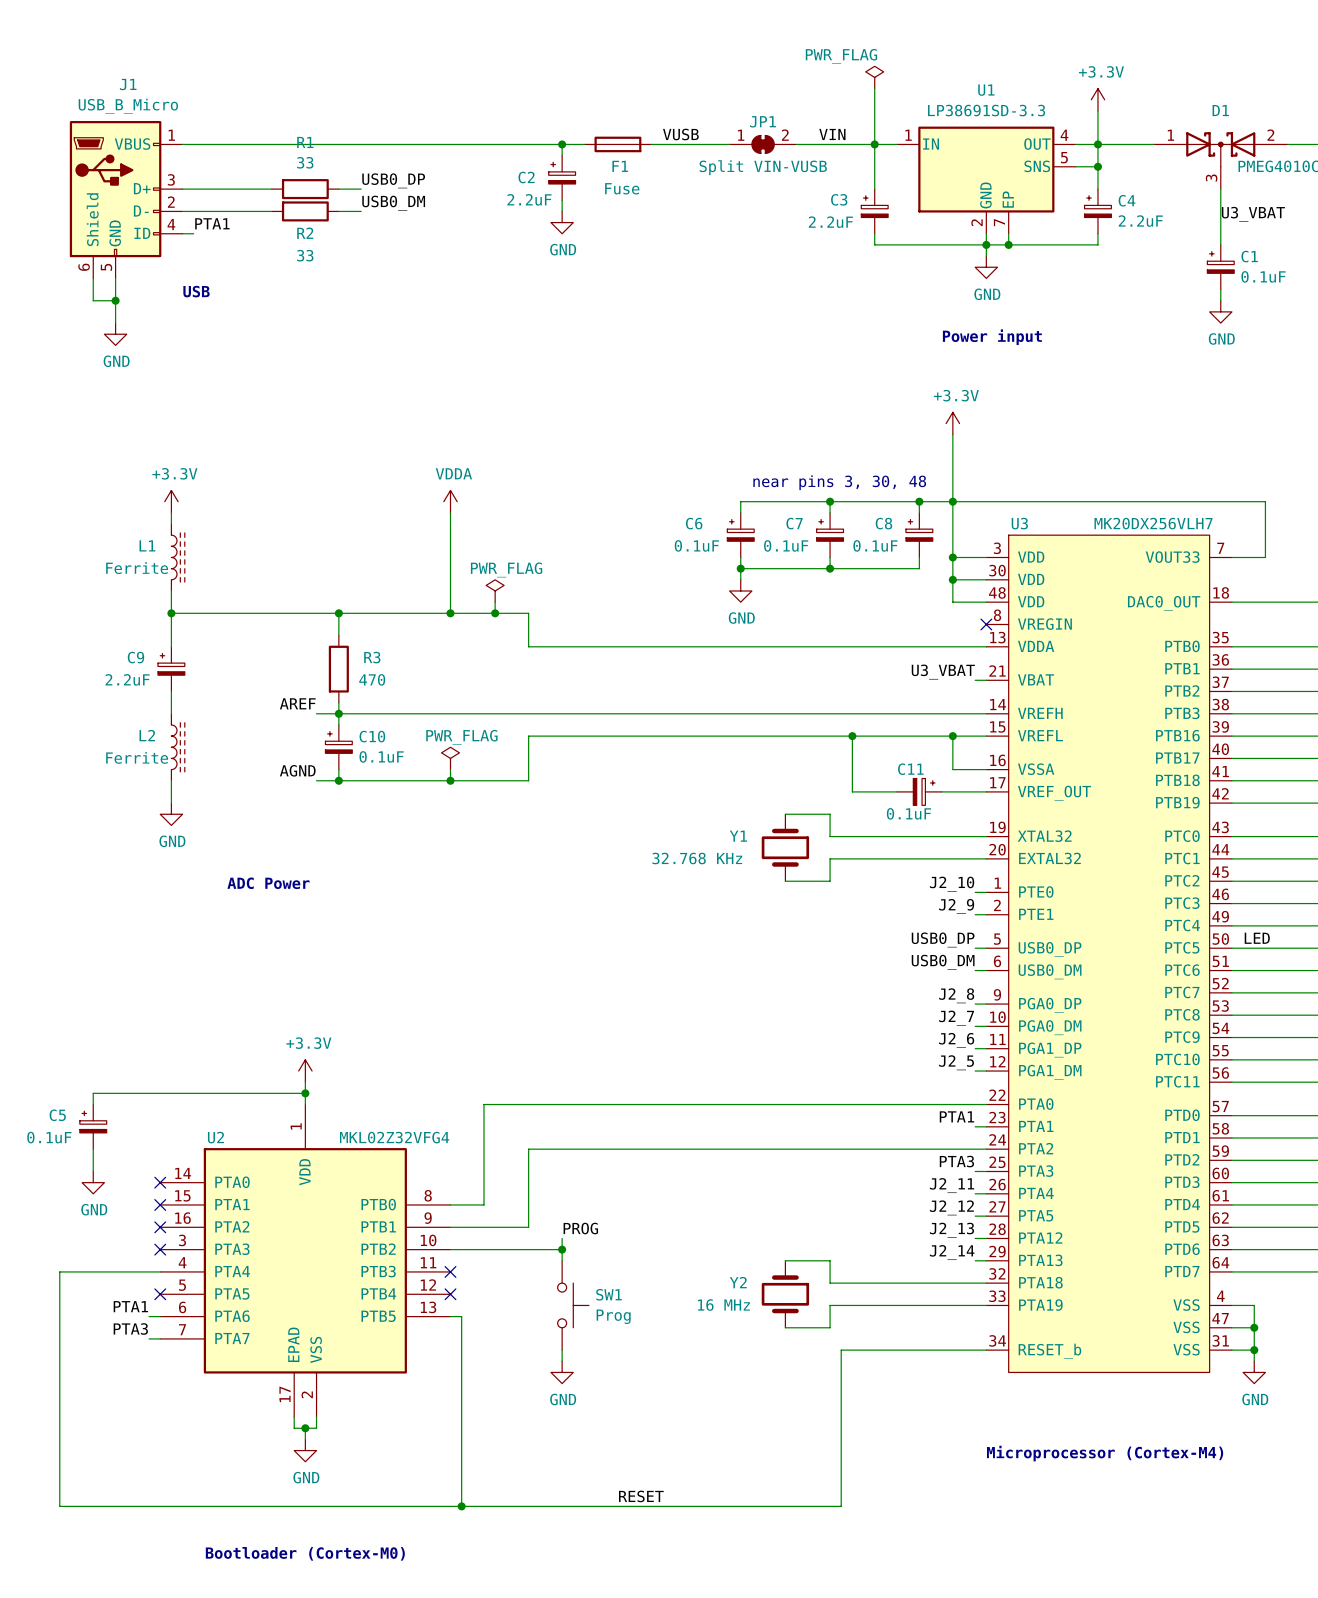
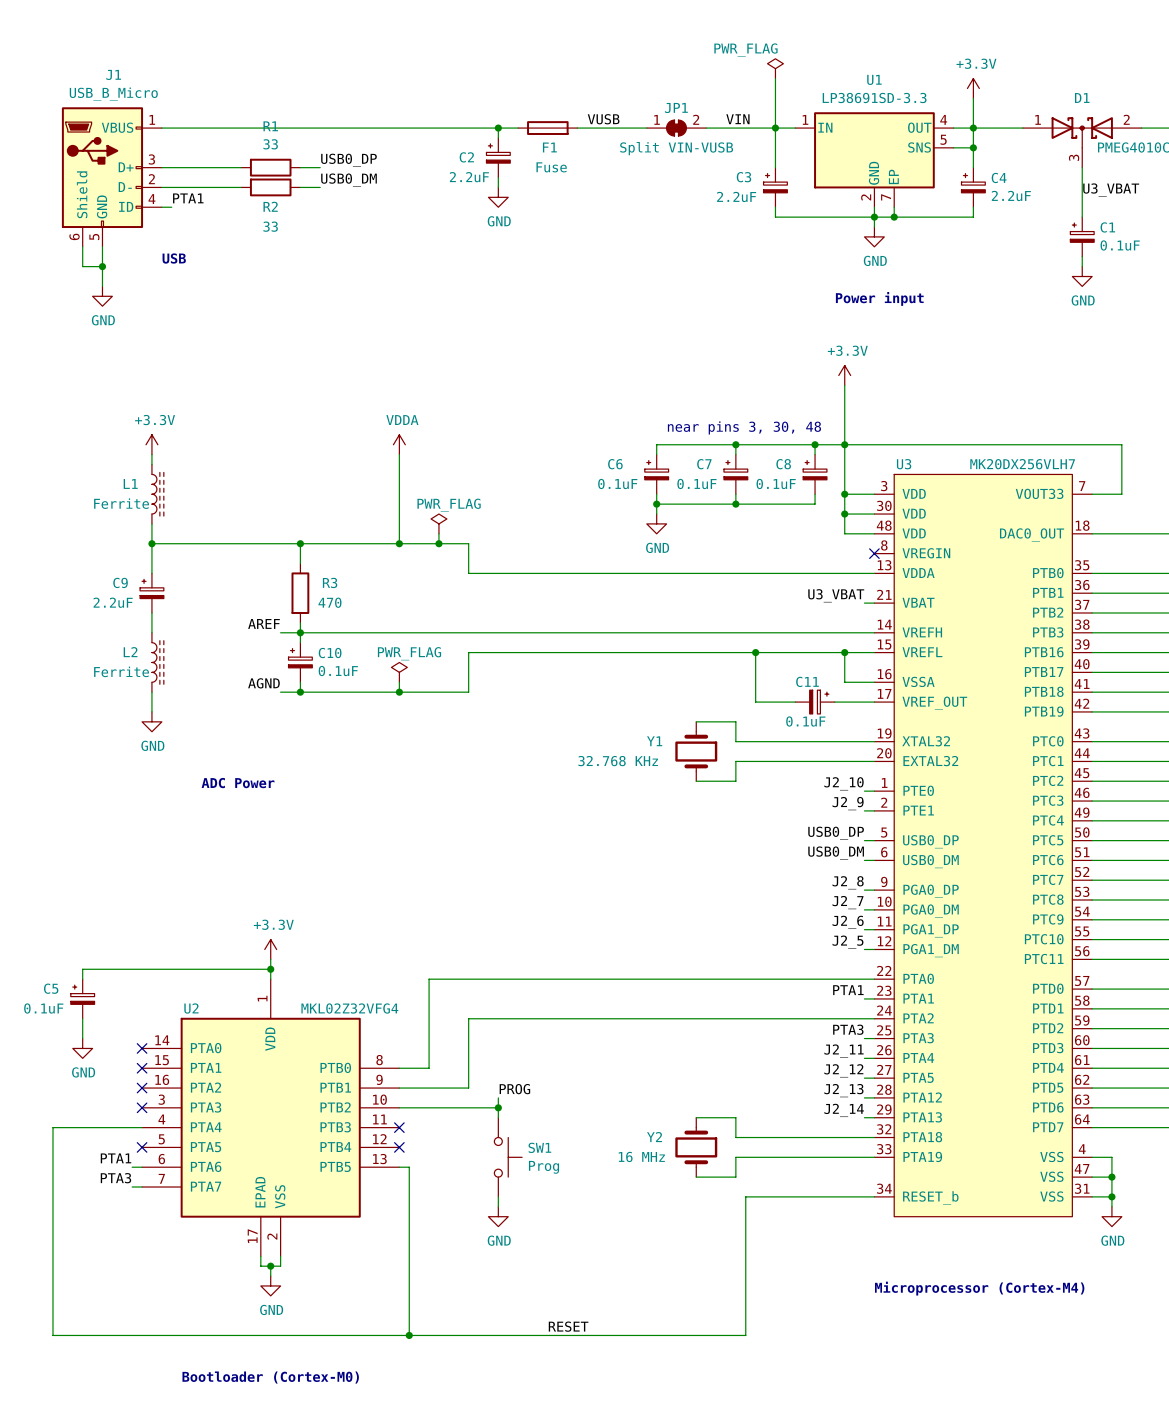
label: LED (1257, 938) -> none

